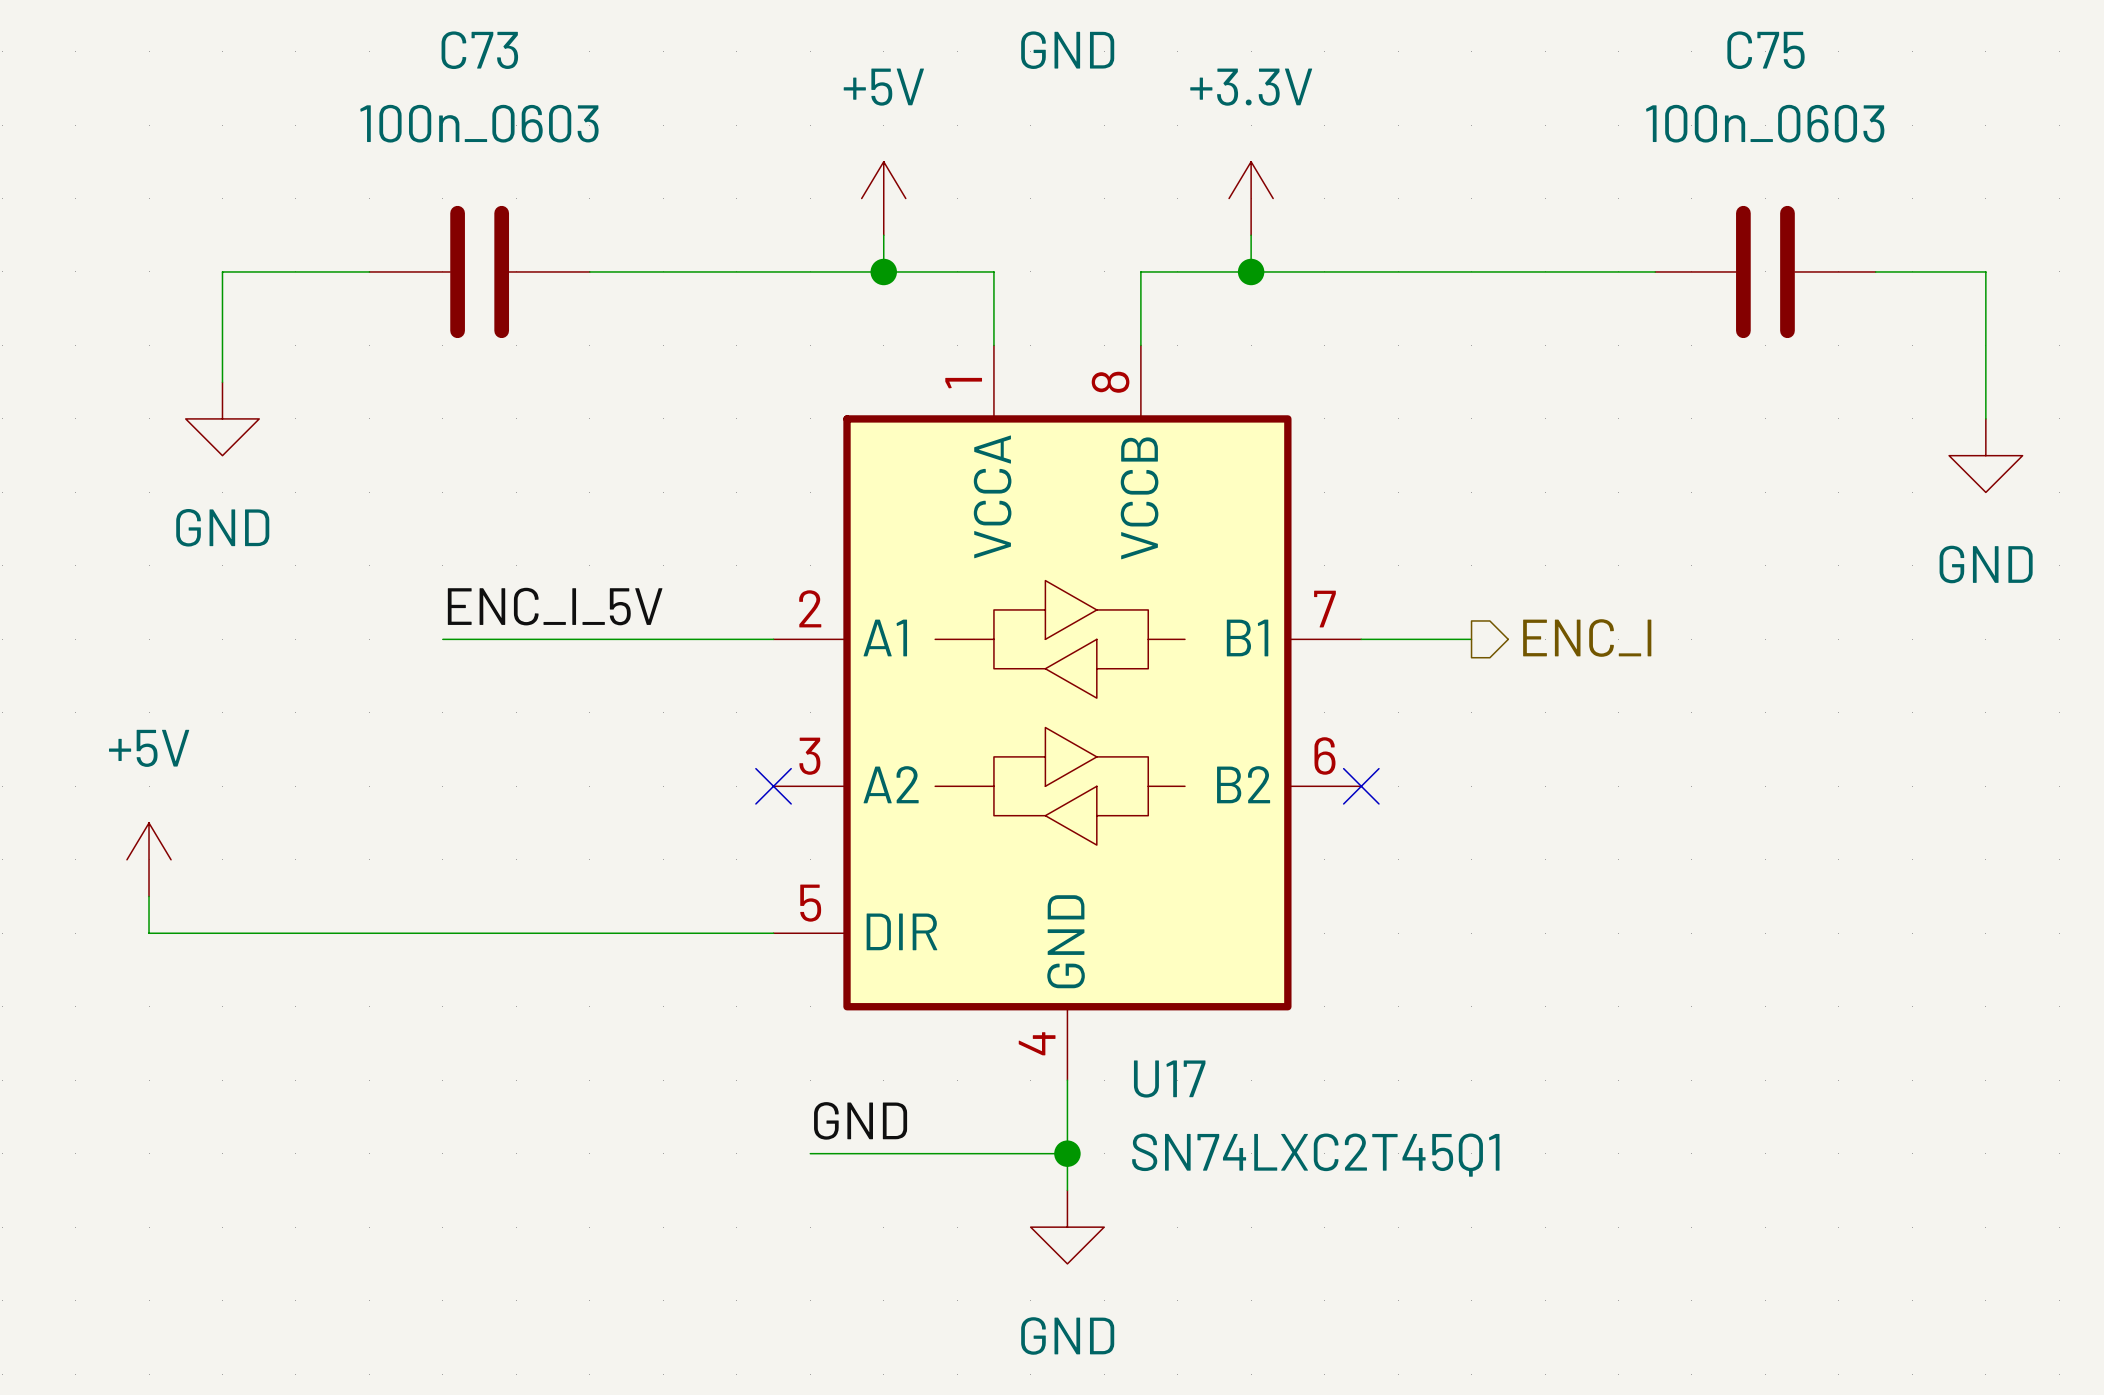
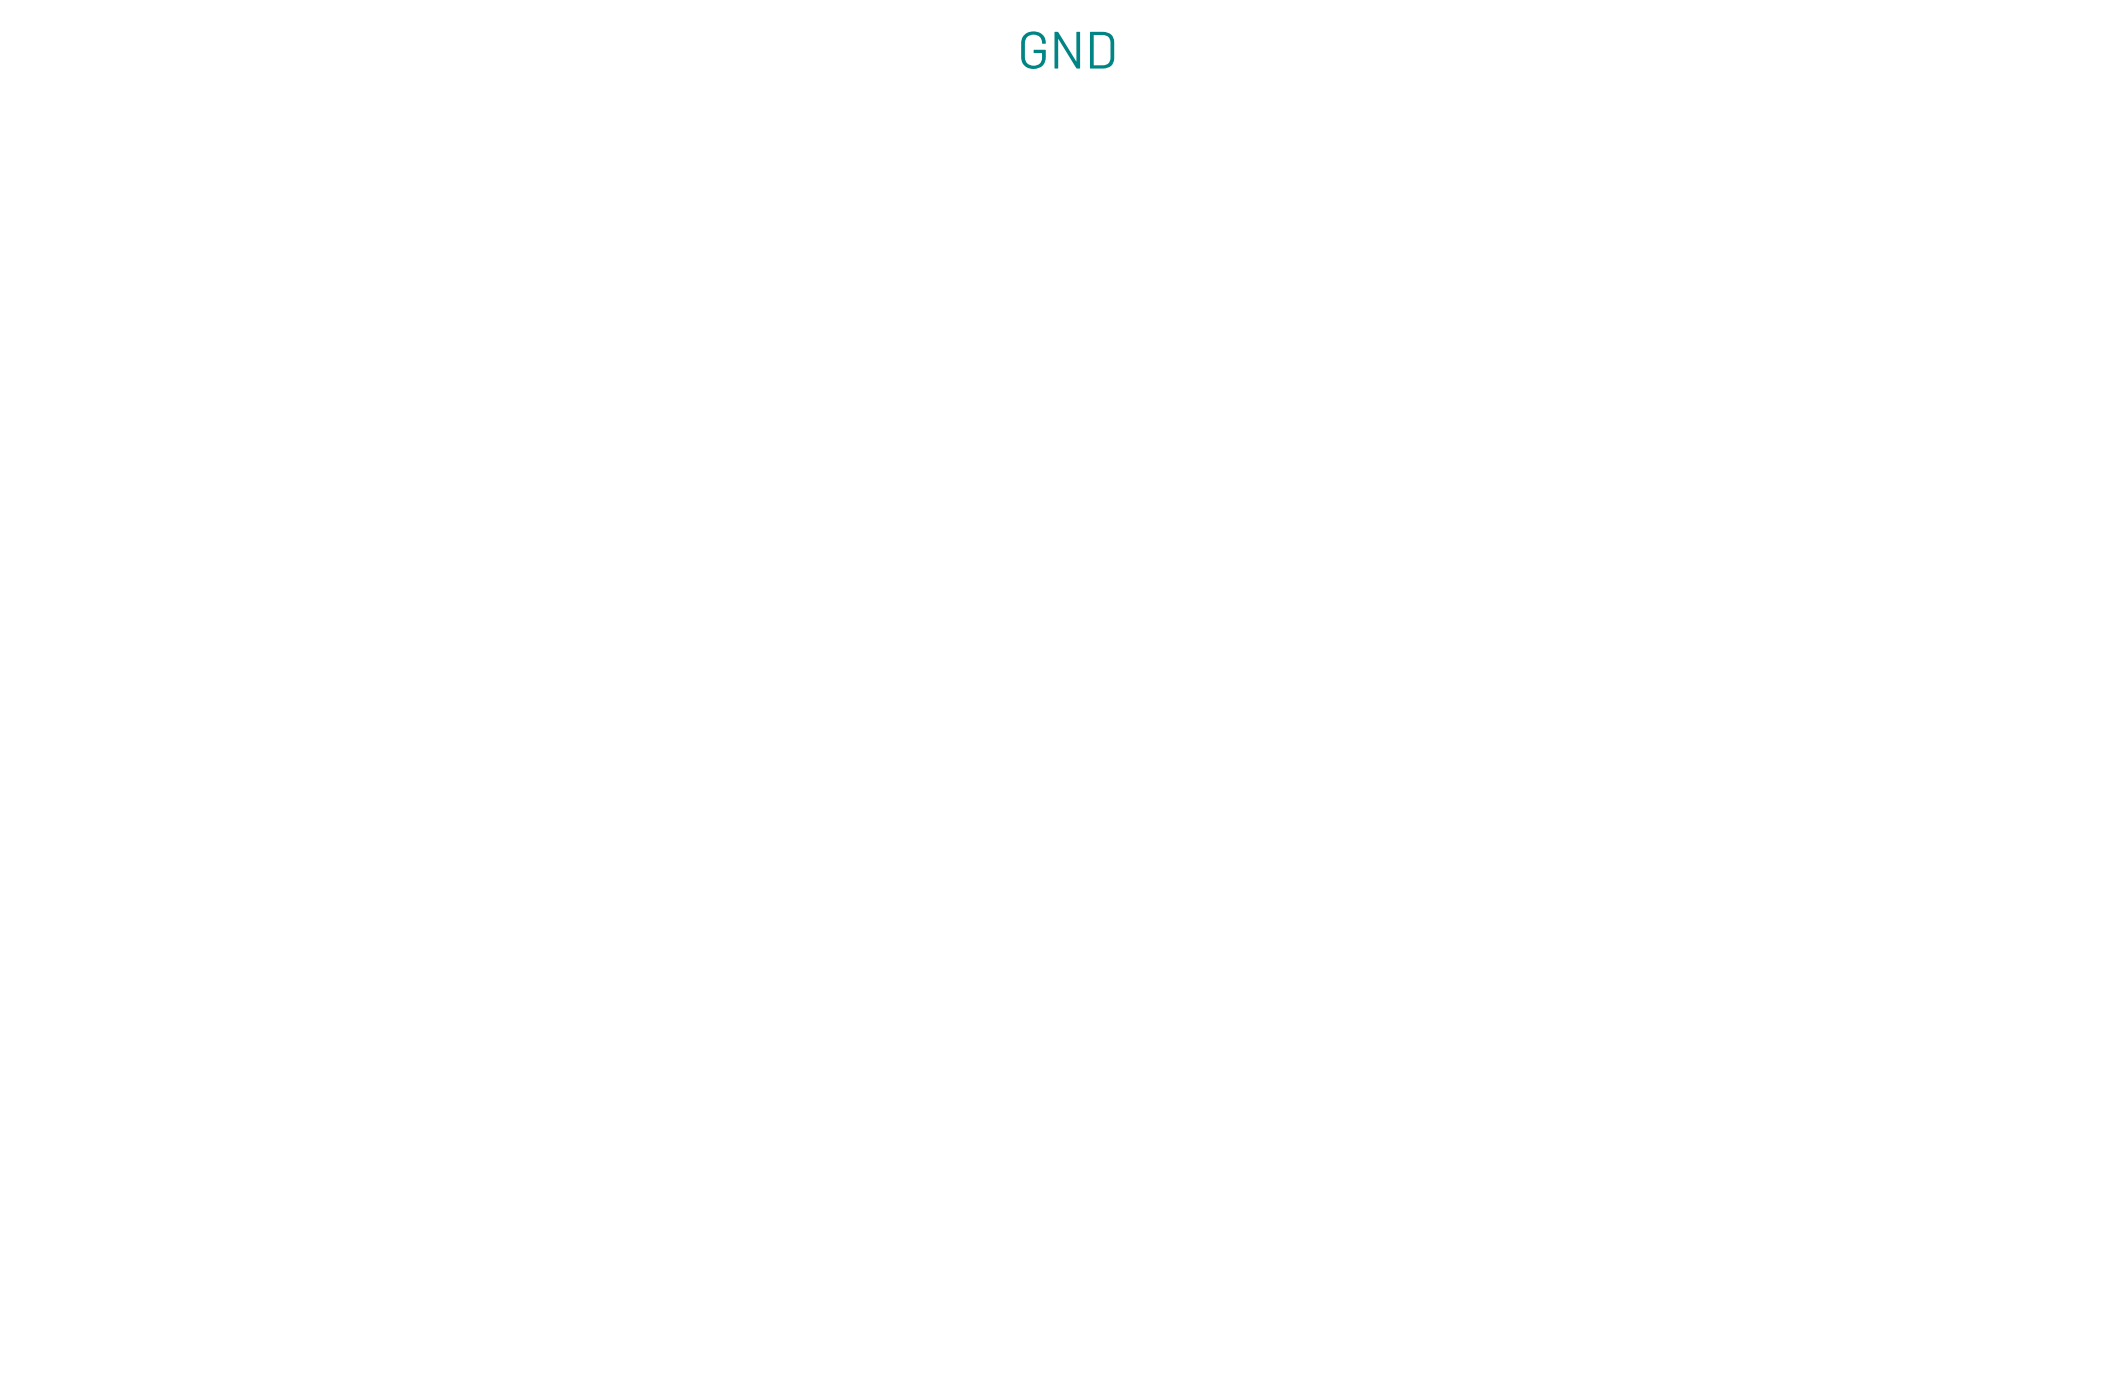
power symbol: +5V (883, 198) -> none
power symbol: +3.3V (1251, 198) -> none
wire: (883, 235) (883, 271) -> none
wire: (1251, 235) (1251, 271) -> none
wire: (369, 271) (222, 271) (222, 382) -> none
C73: 100n_0603 (479, 271) -> none
wire: (589, 271) (993, 271) (993, 345) -> none
junction: (883, 271) -> none
junction: (1251, 271) -> none
wire: (1655, 271) (1140, 271) (1140, 345) -> none
C75: 100n_0603 (1765, 271) -> none
wire: (1875, 271) (1985, 271) (1985, 418) -> none
power symbol: GND (222, 418) -> none
power symbol: GND (1985, 455) -> none
label: ENC_I_5V (555, 606) -> none
hierarchical label: ENC_I (1587, 638) -> none
wire: (442, 639) (773, 639) -> none
wire: (1361, 639) (1471, 639) -> none
U17: SN74LXC2T45Q1 (1067, 712) -> none
no-connect mark: (773, 786) -> none
no-connect mark: (1361, 786) -> none
power symbol: +5V (149, 859) -> none
wire: (149, 896) (149, 933) (773, 933) -> none
wire: (1067, 1080) (1067, 1190) -> none
label: GND (860, 1120) -> none
wire: (810, 1153) (1067, 1153) -> none
junction: (1067, 1153) -> none
power symbol: GND (1067, 1227) -> none

